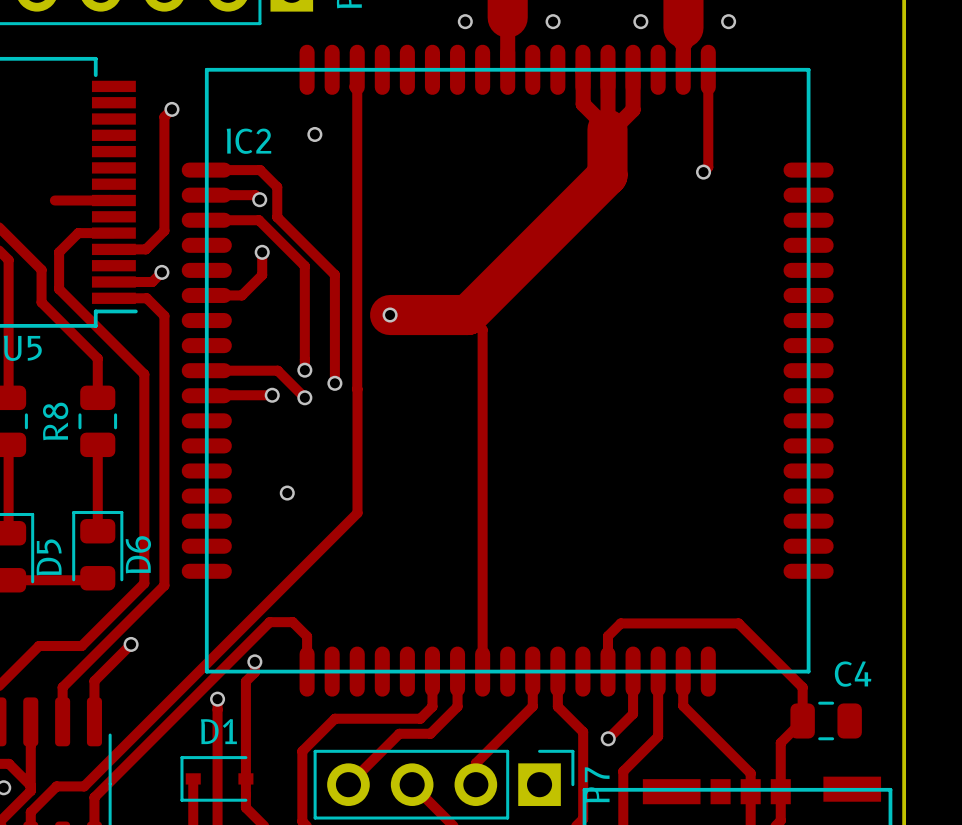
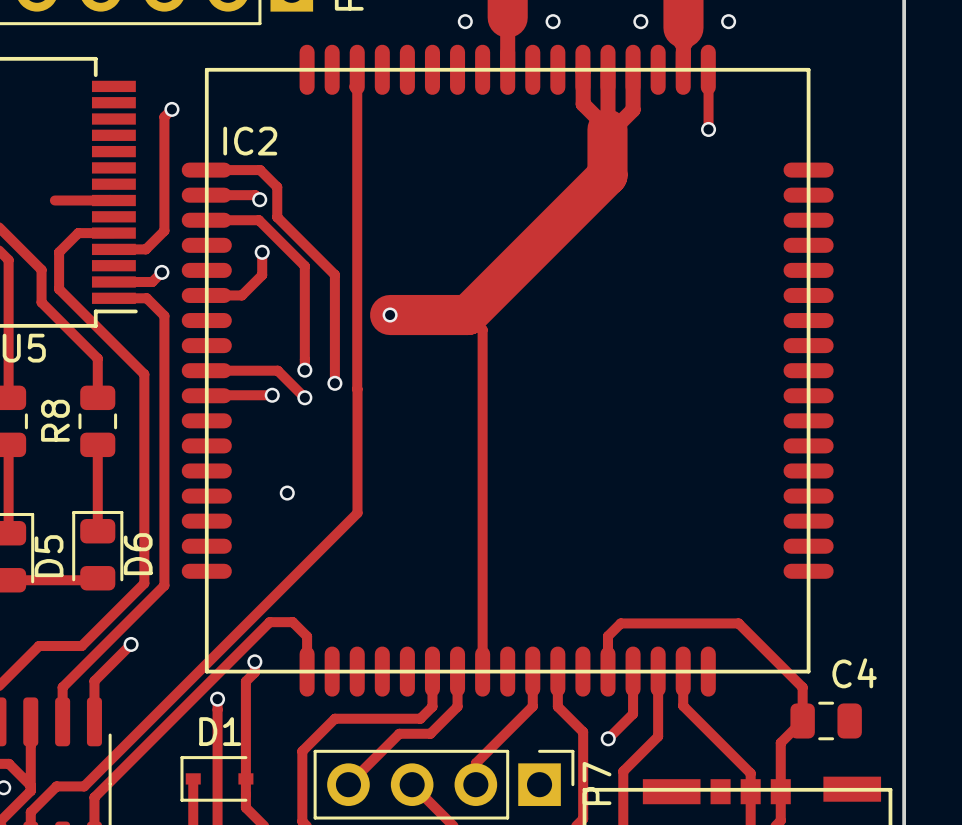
track: (708, 69) (708, 167) (703, 172) -> (708, 70) (708, 129)
via: (314, 134) -> none
via position: (703, 172) -> (708, 129)

